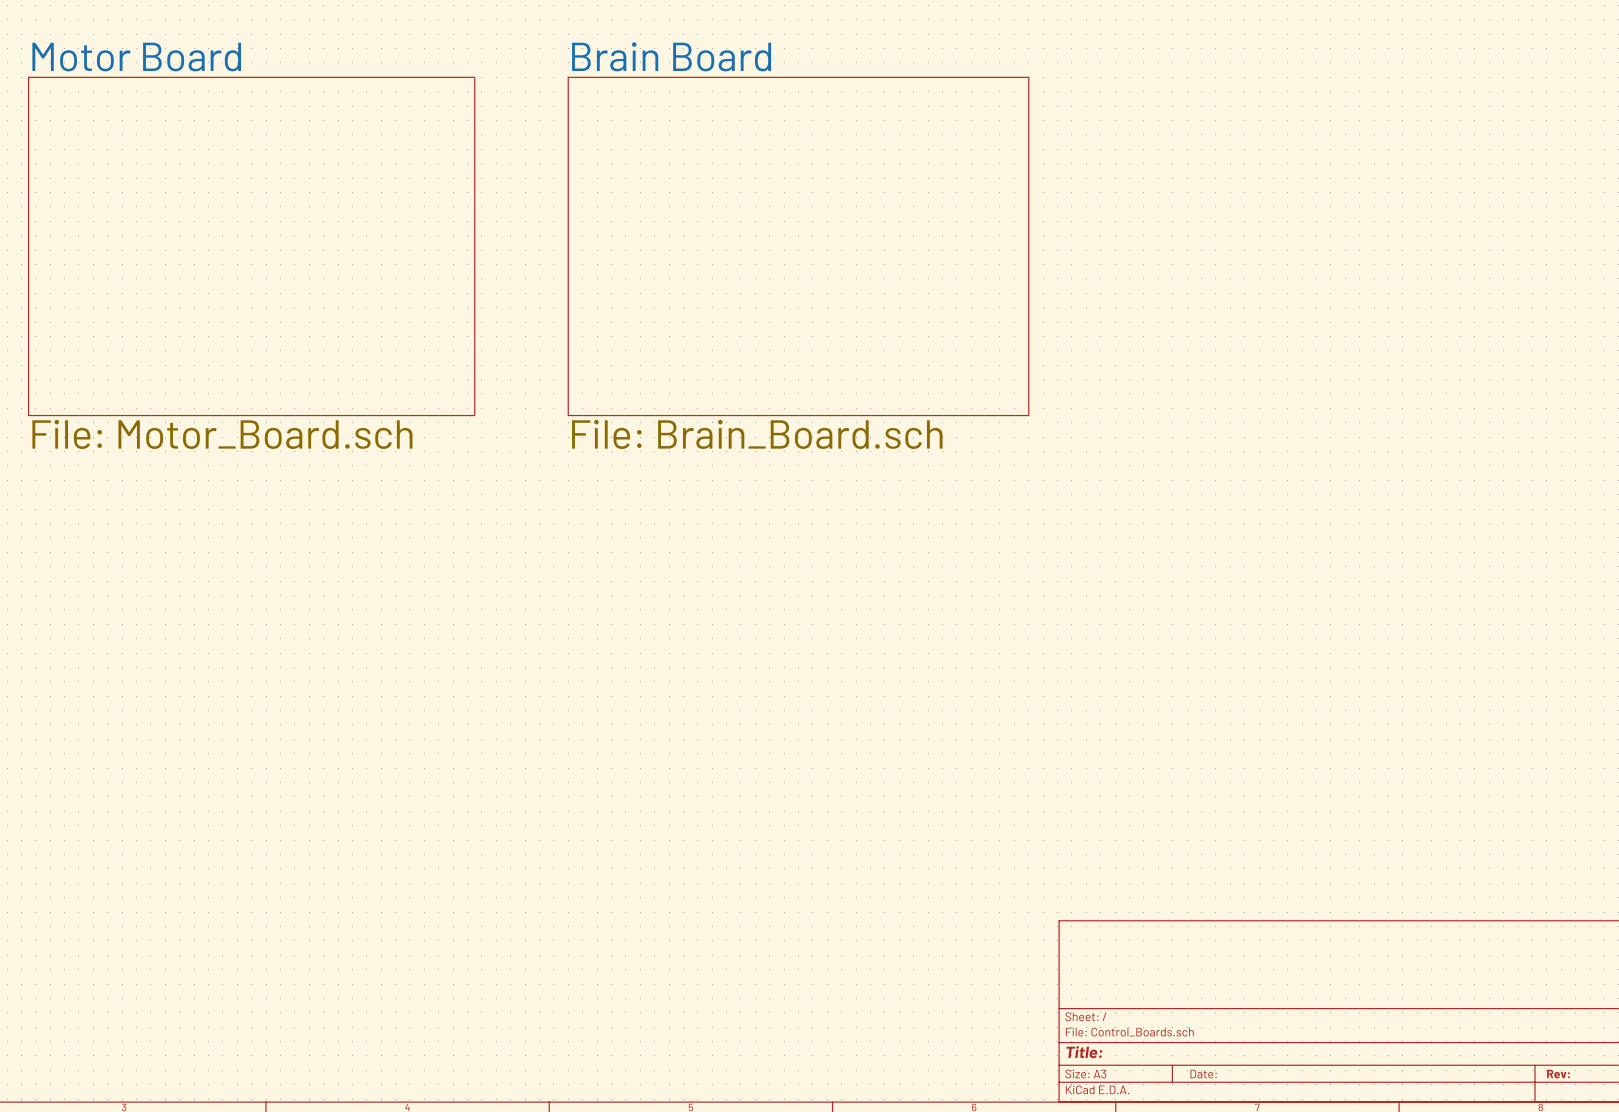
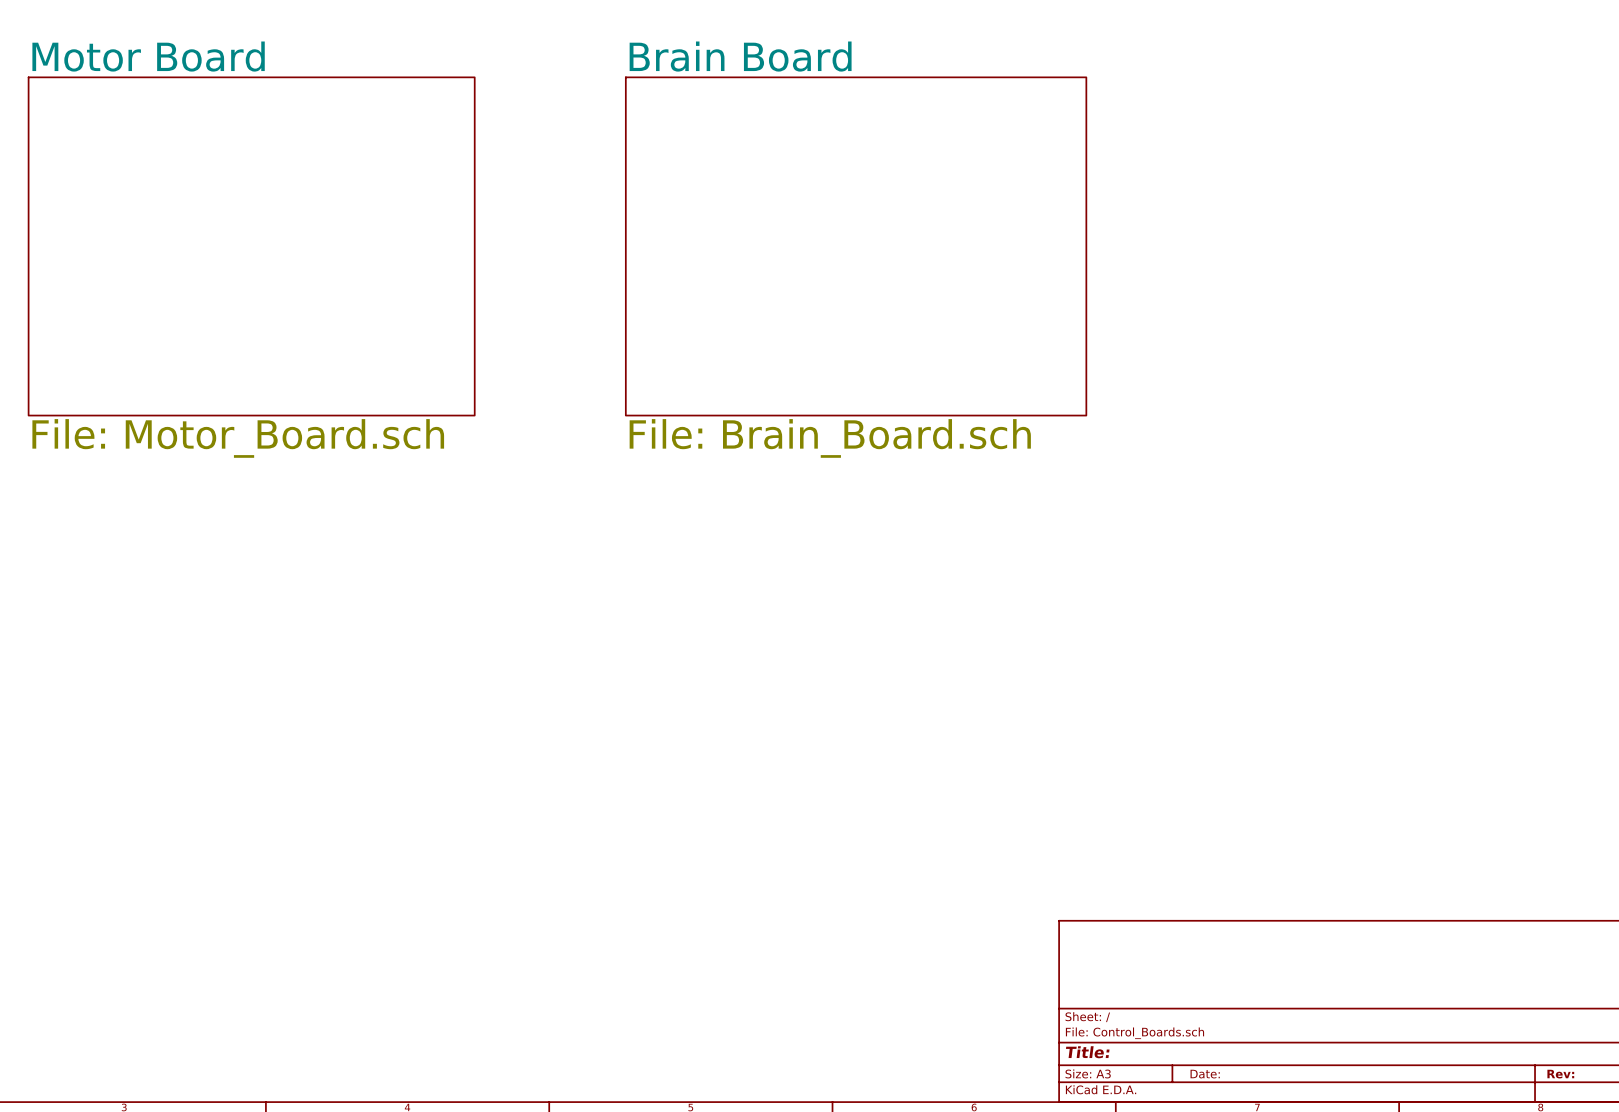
sheet Brain Board position: (798, 246) -> (856, 246)

